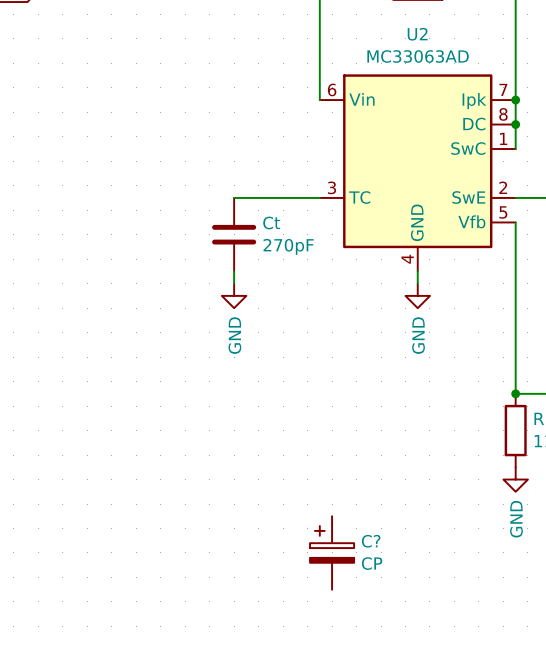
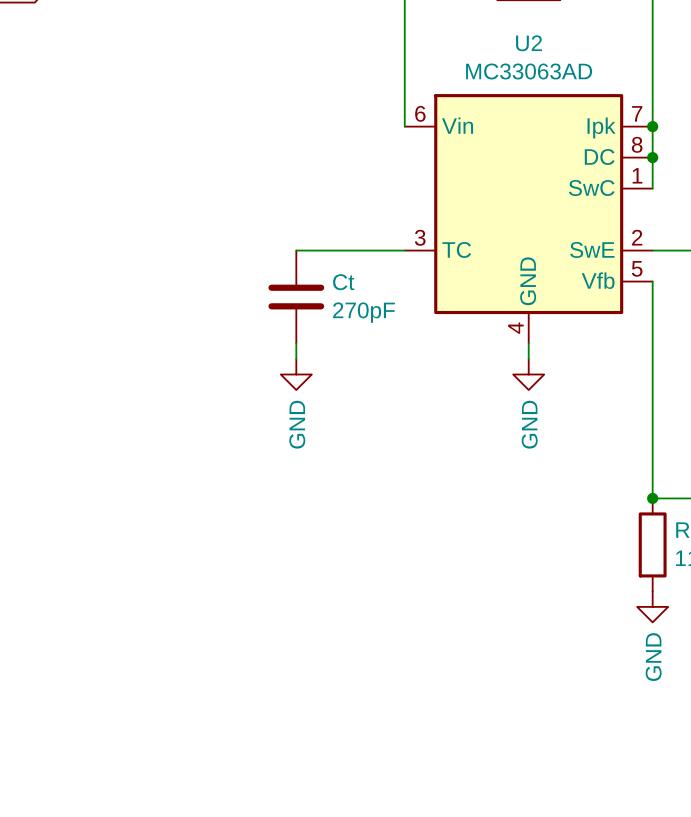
C?: CP (332, 552) -> none

